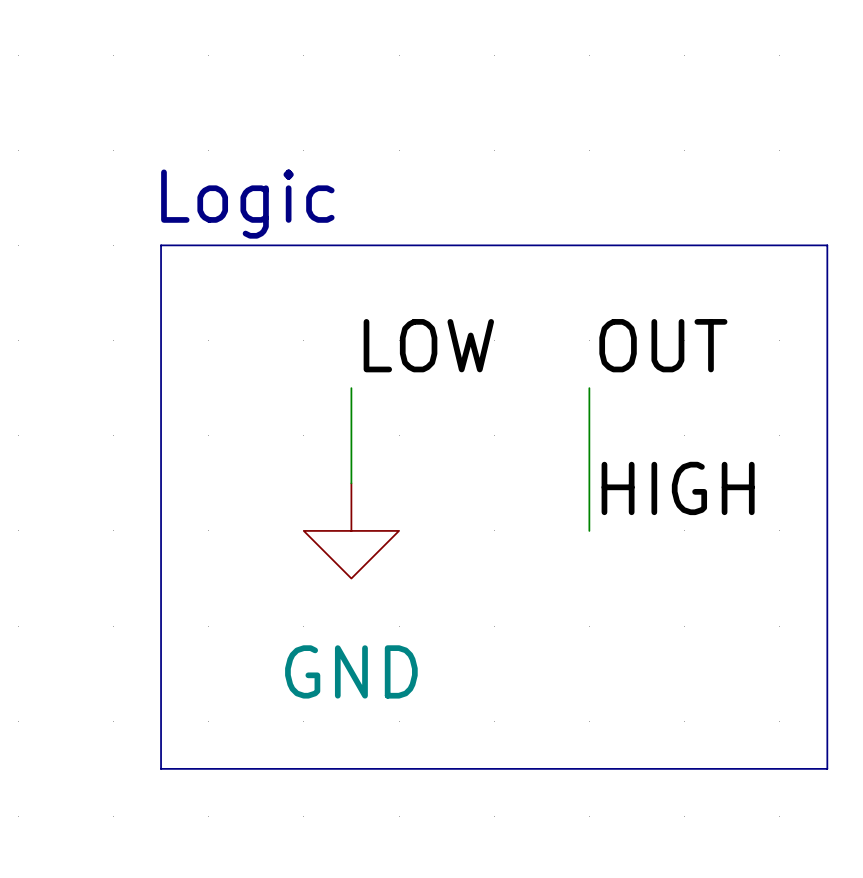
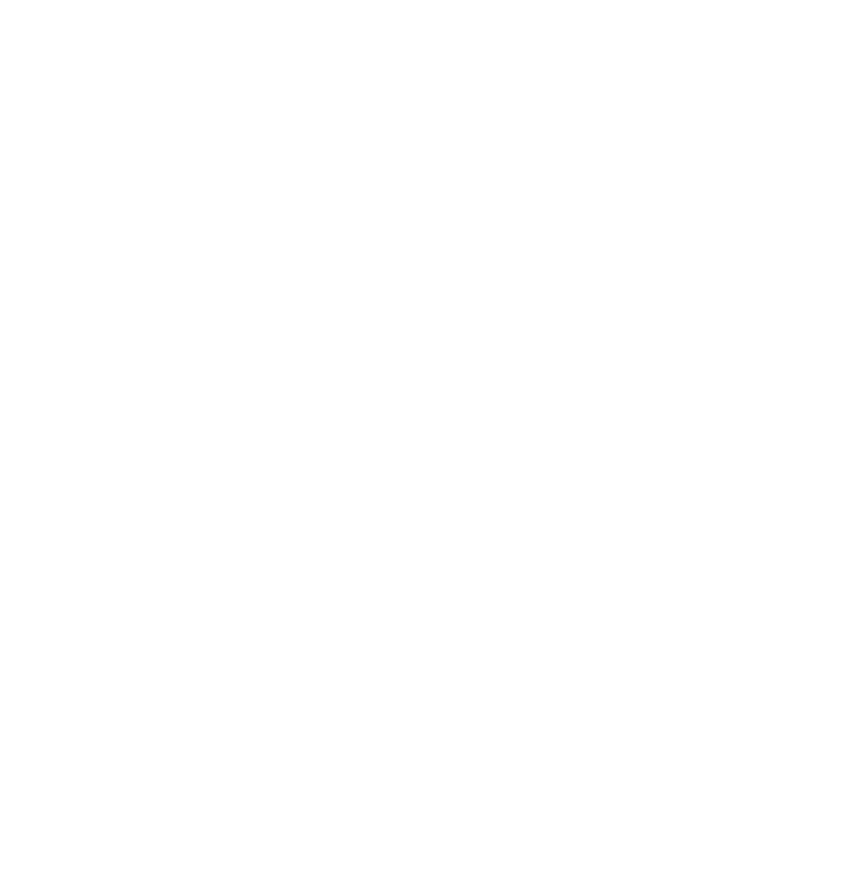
text: Logic (247, 204) -> none
line: (161, 245) (827, 245) (827, 768) (161, 768) (161, 245) -> none
label: LOW (428, 345) -> none
label: OUT (663, 345) -> none
wire: (351, 388) (351, 483) -> none
wire: (589, 388) (589, 530) -> none
label: HIGH (678, 488) -> none
power symbol: GND (351, 530) -> none

